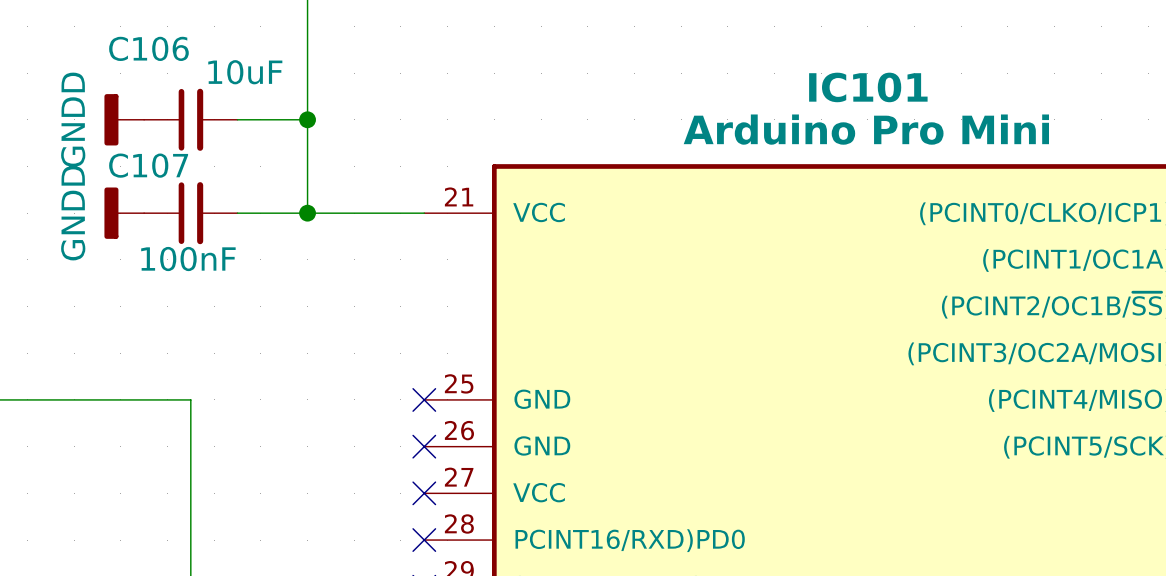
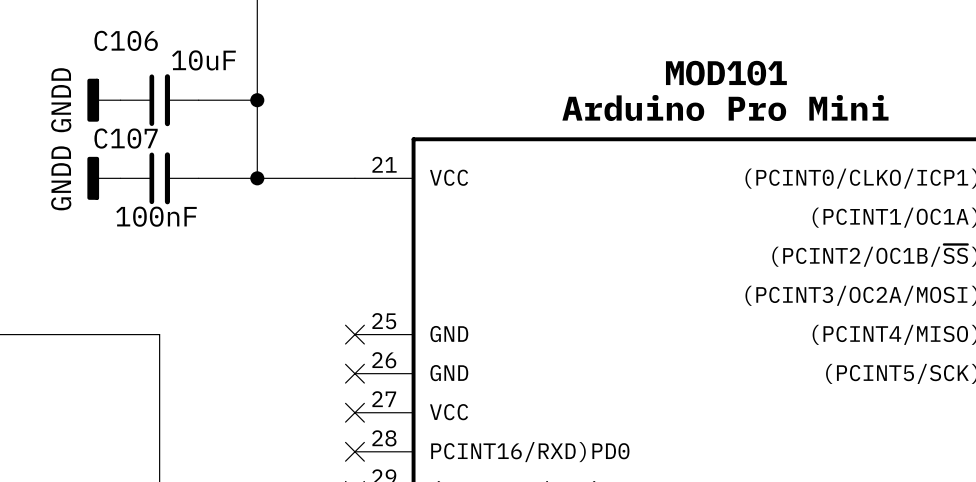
IC101 name: IC101 (868, 87) -> MOD101 (726, 73)

